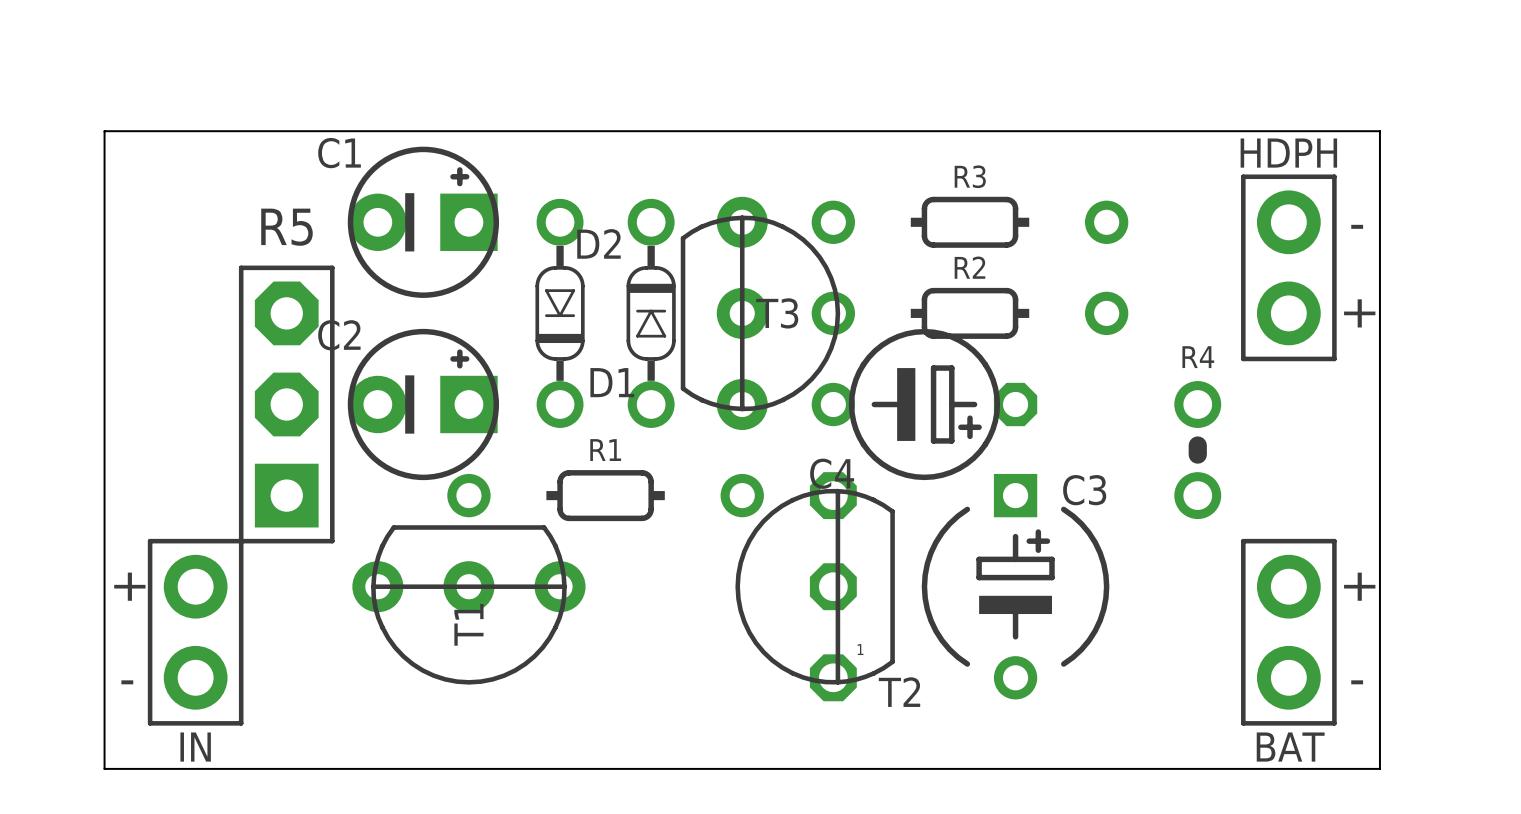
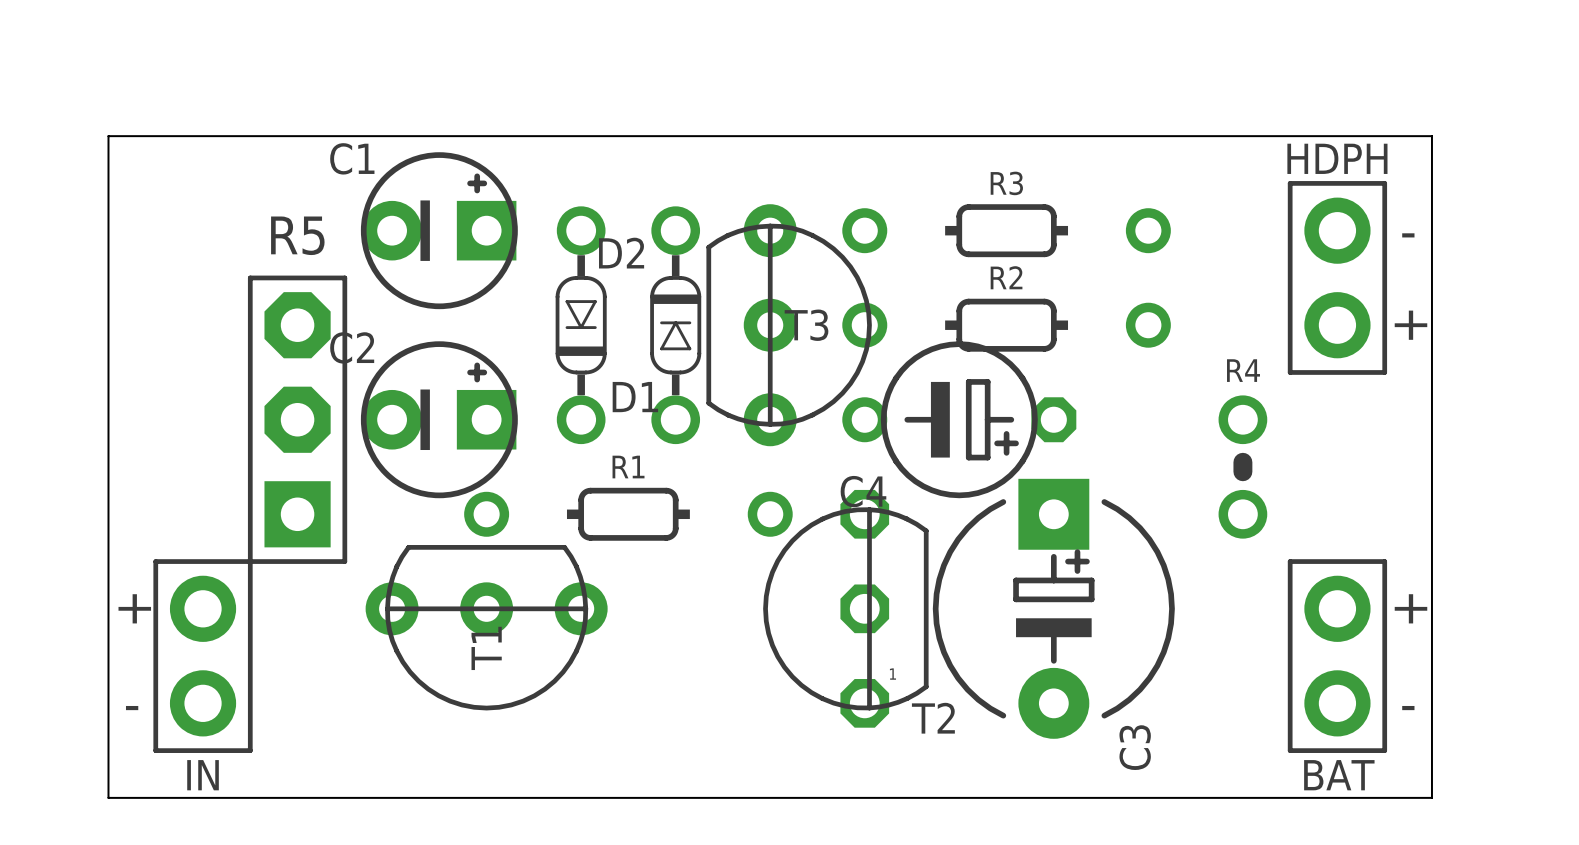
C3 footprint: [921, 473, 1110, 700] -> [932, 478, 1175, 739]
C3 name rotation: 0° (1084, 490) -> 90° counterclockwise (1135, 747)
C3 name position: C3 (1084, 490) -> C3 (1135, 747)

